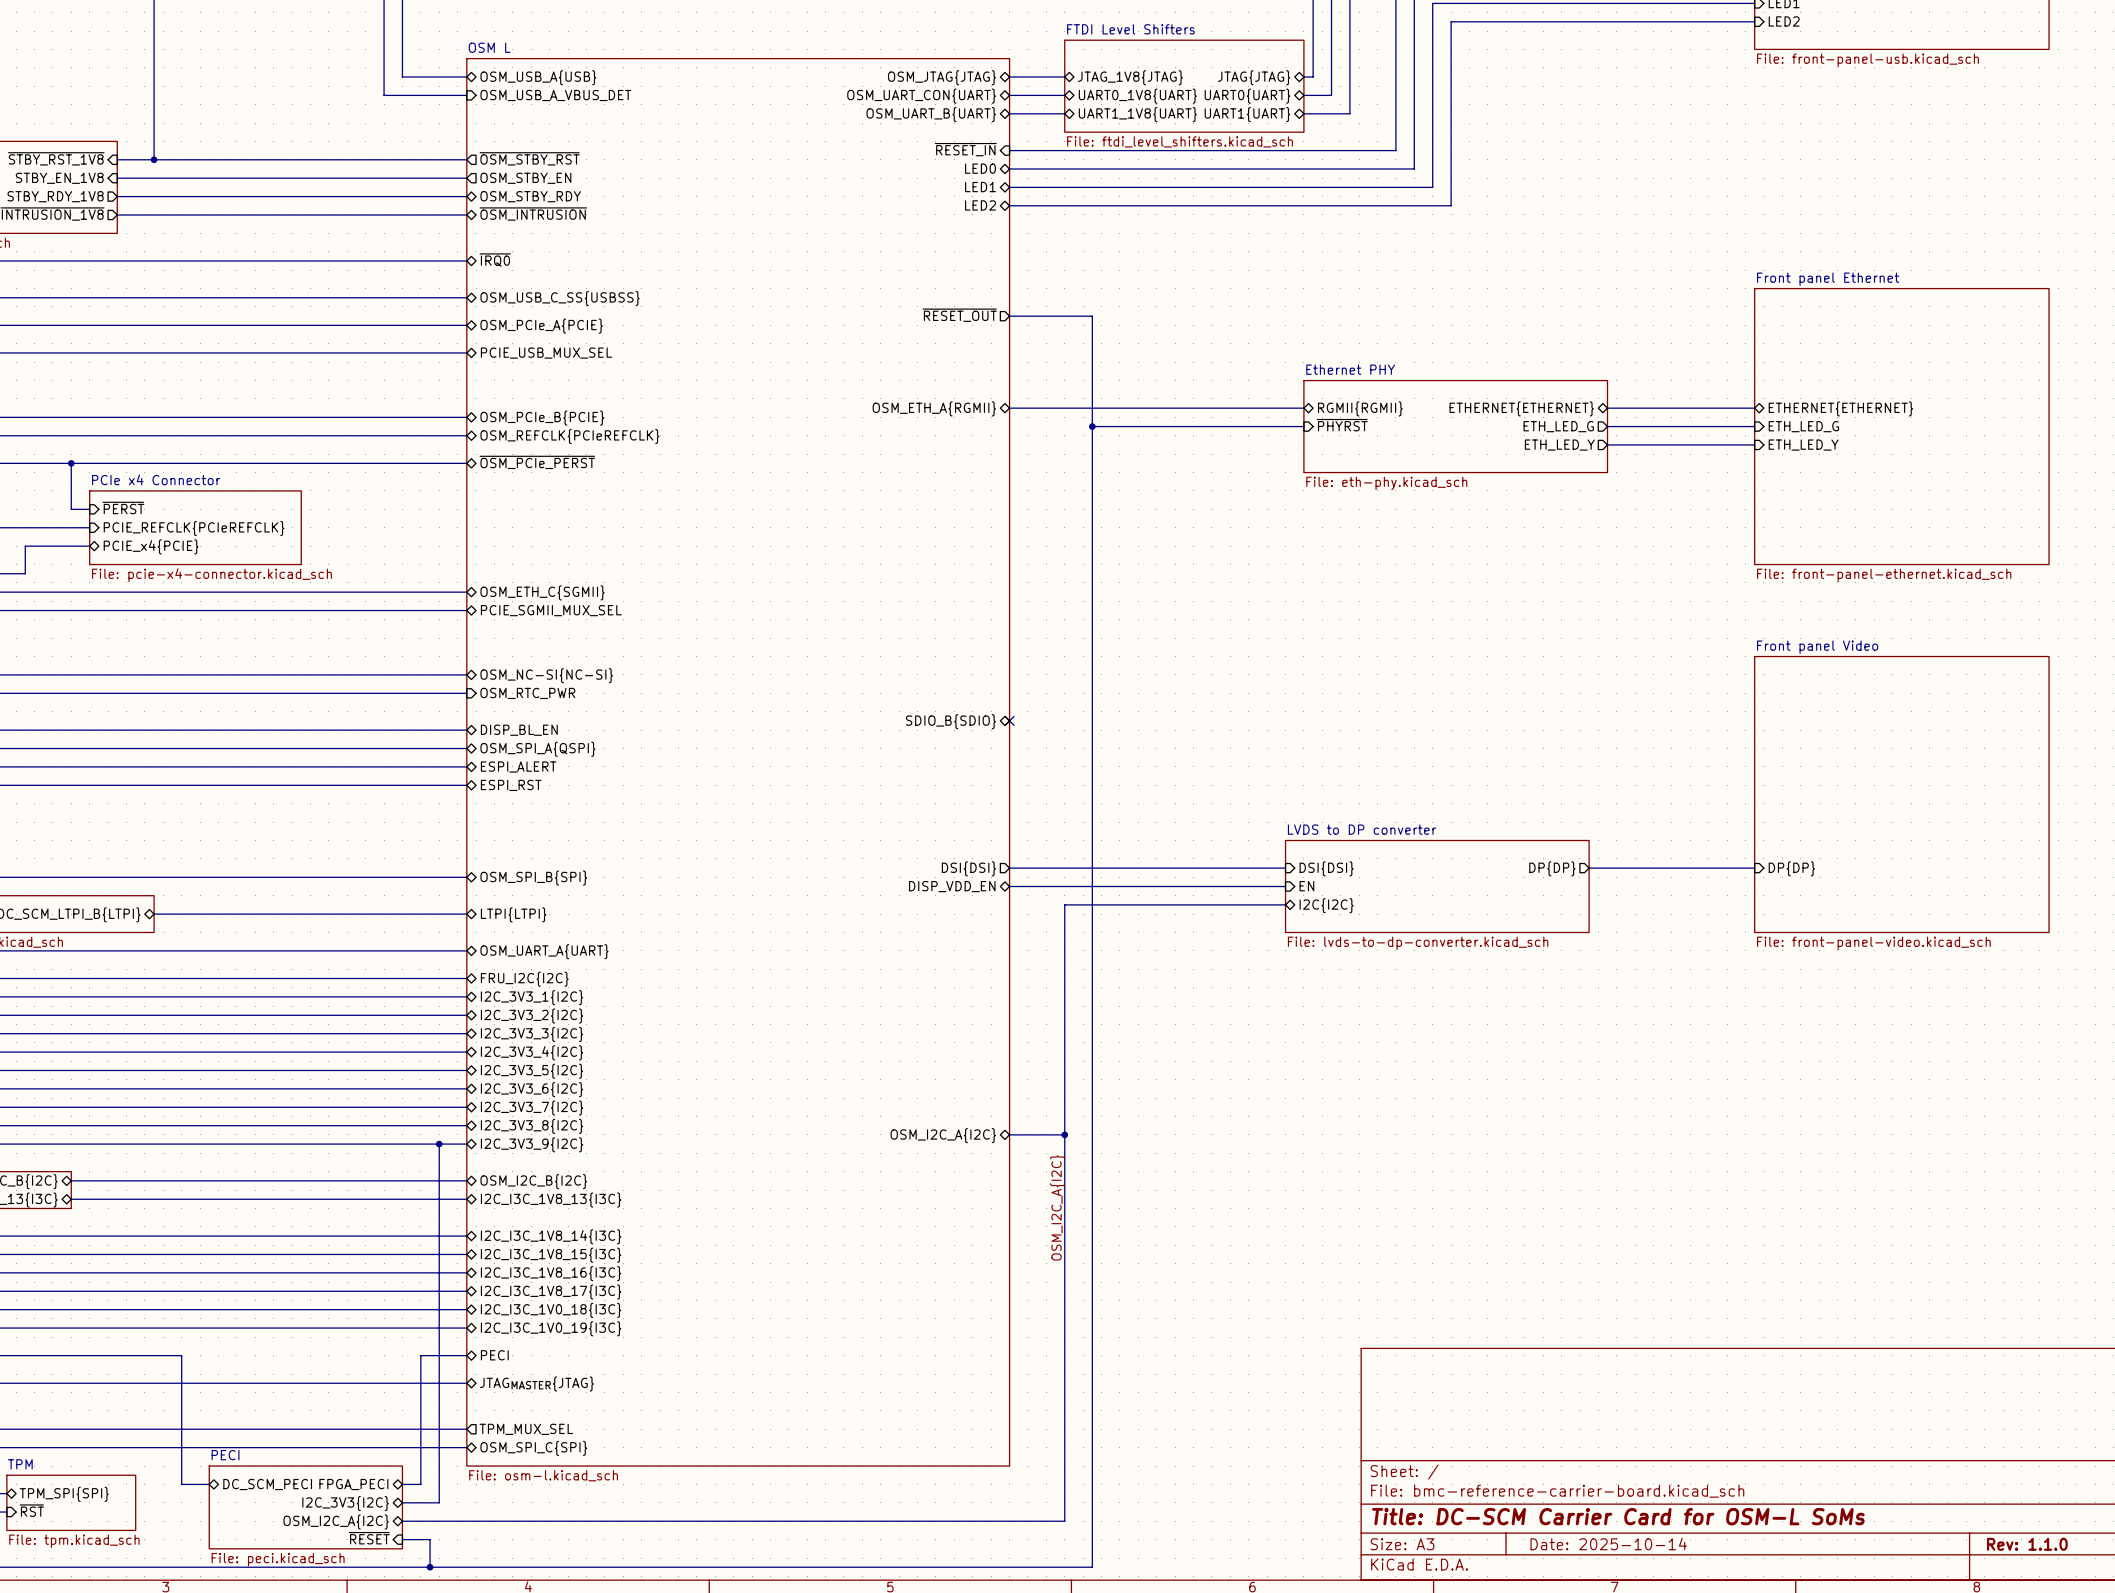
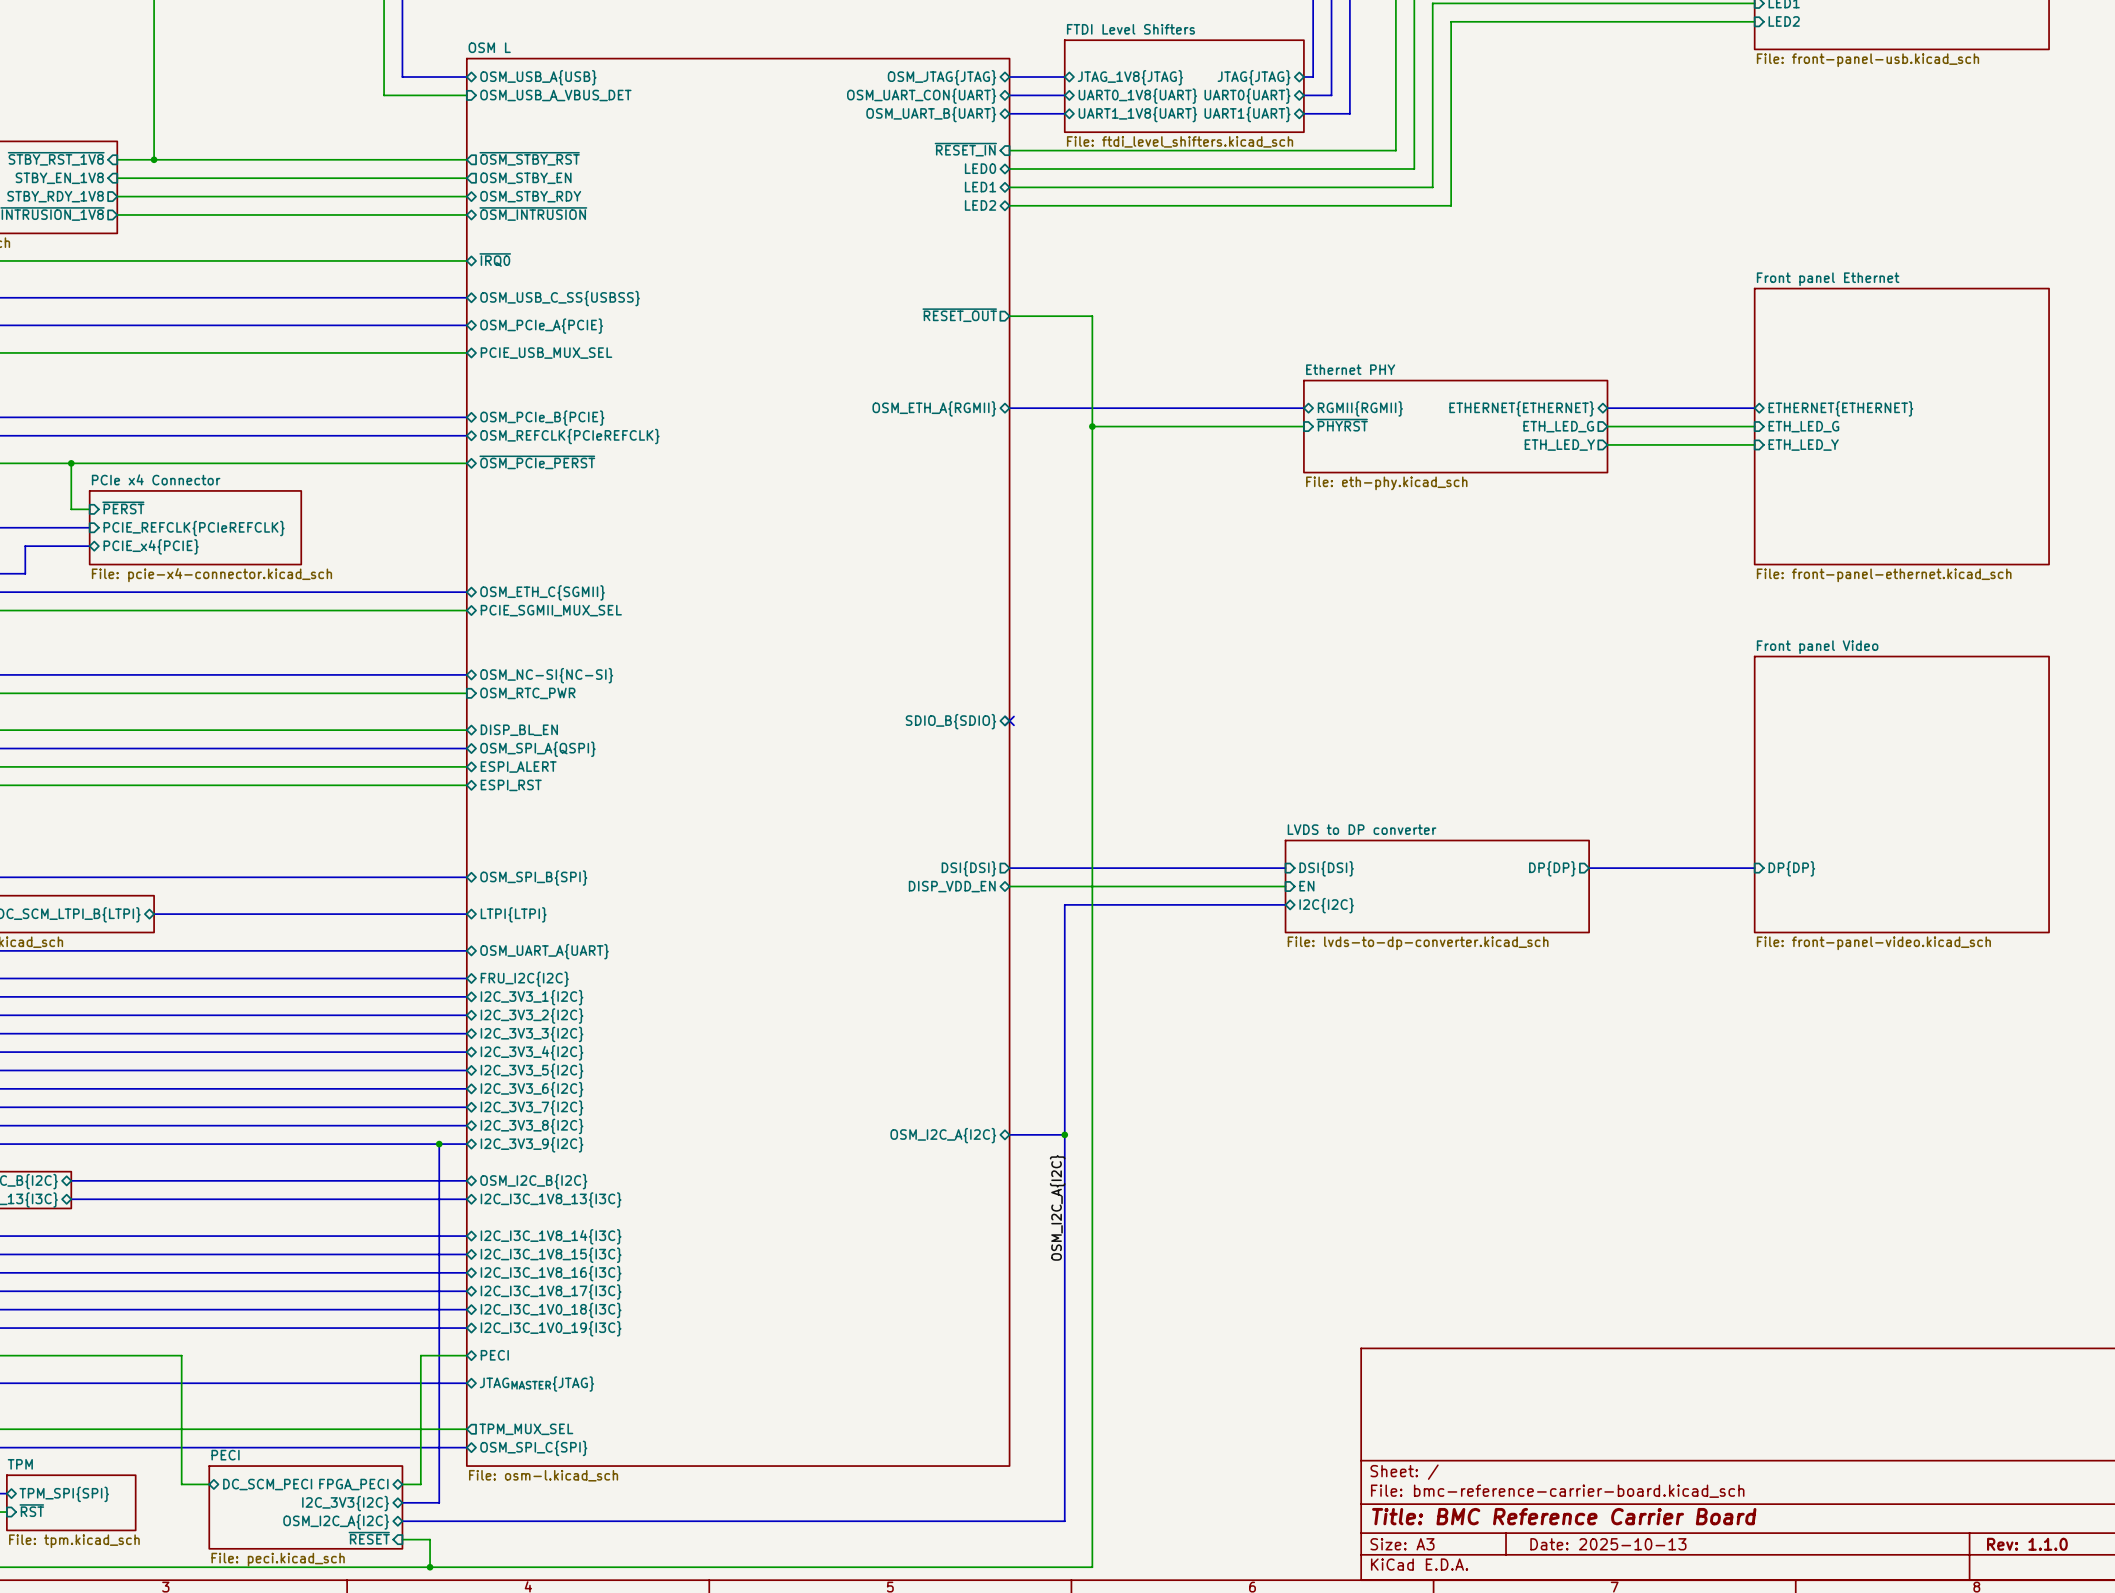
title block: Title: DC-SCM Carrier Card for OSM-L SoMs (1618, 1516) -> Title: BMC Reference Carrier Board (1564, 1516)
title block: Date: 2025-10-14 (1608, 1544) -> Date: 2025-10-13 (1608, 1544)

